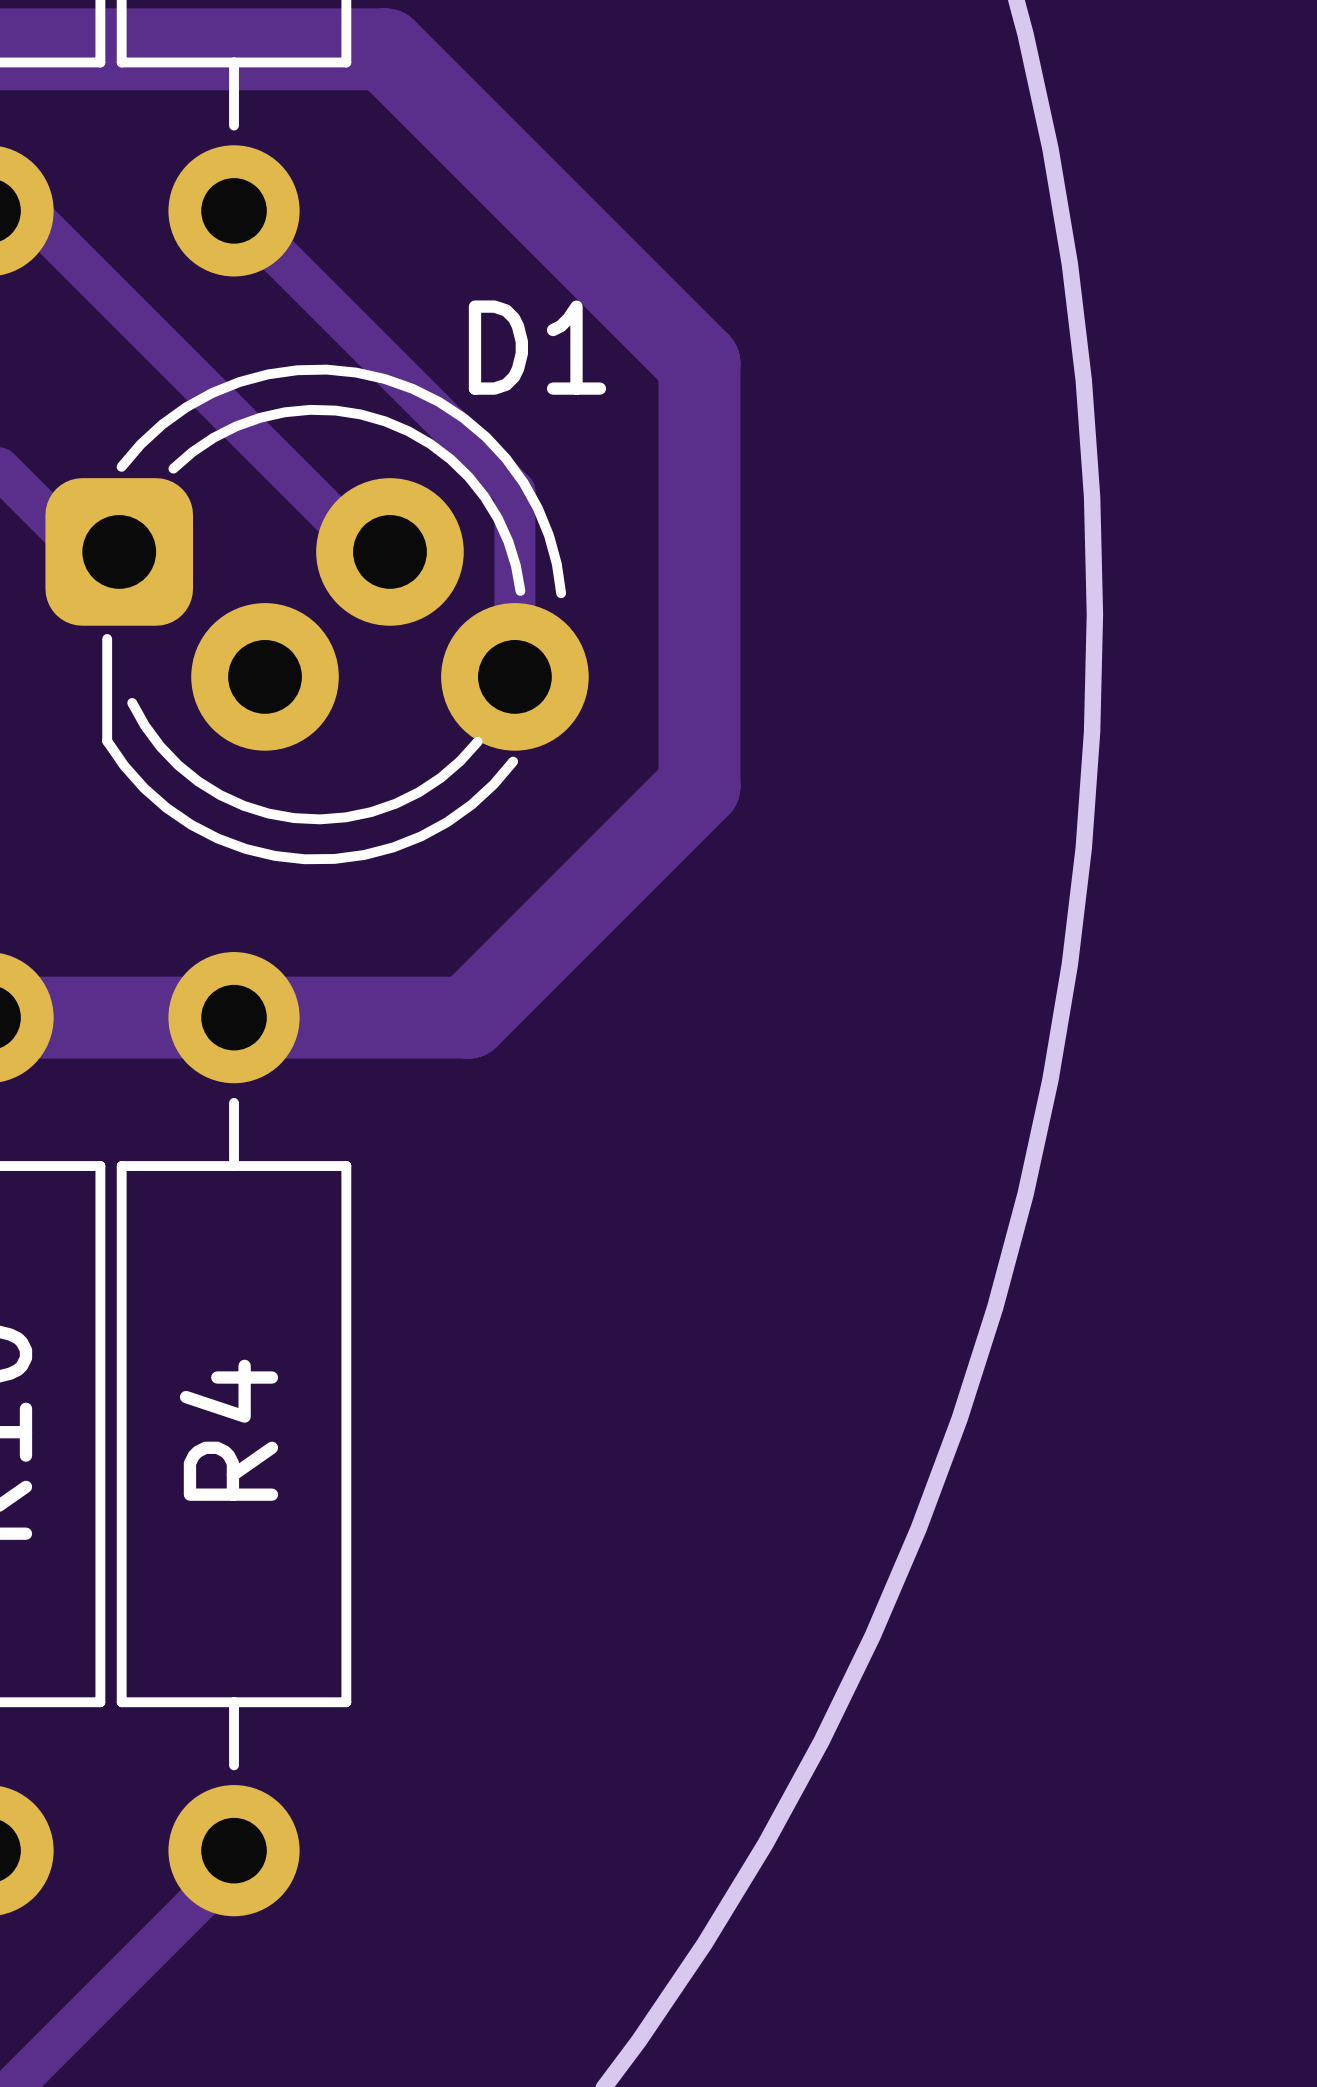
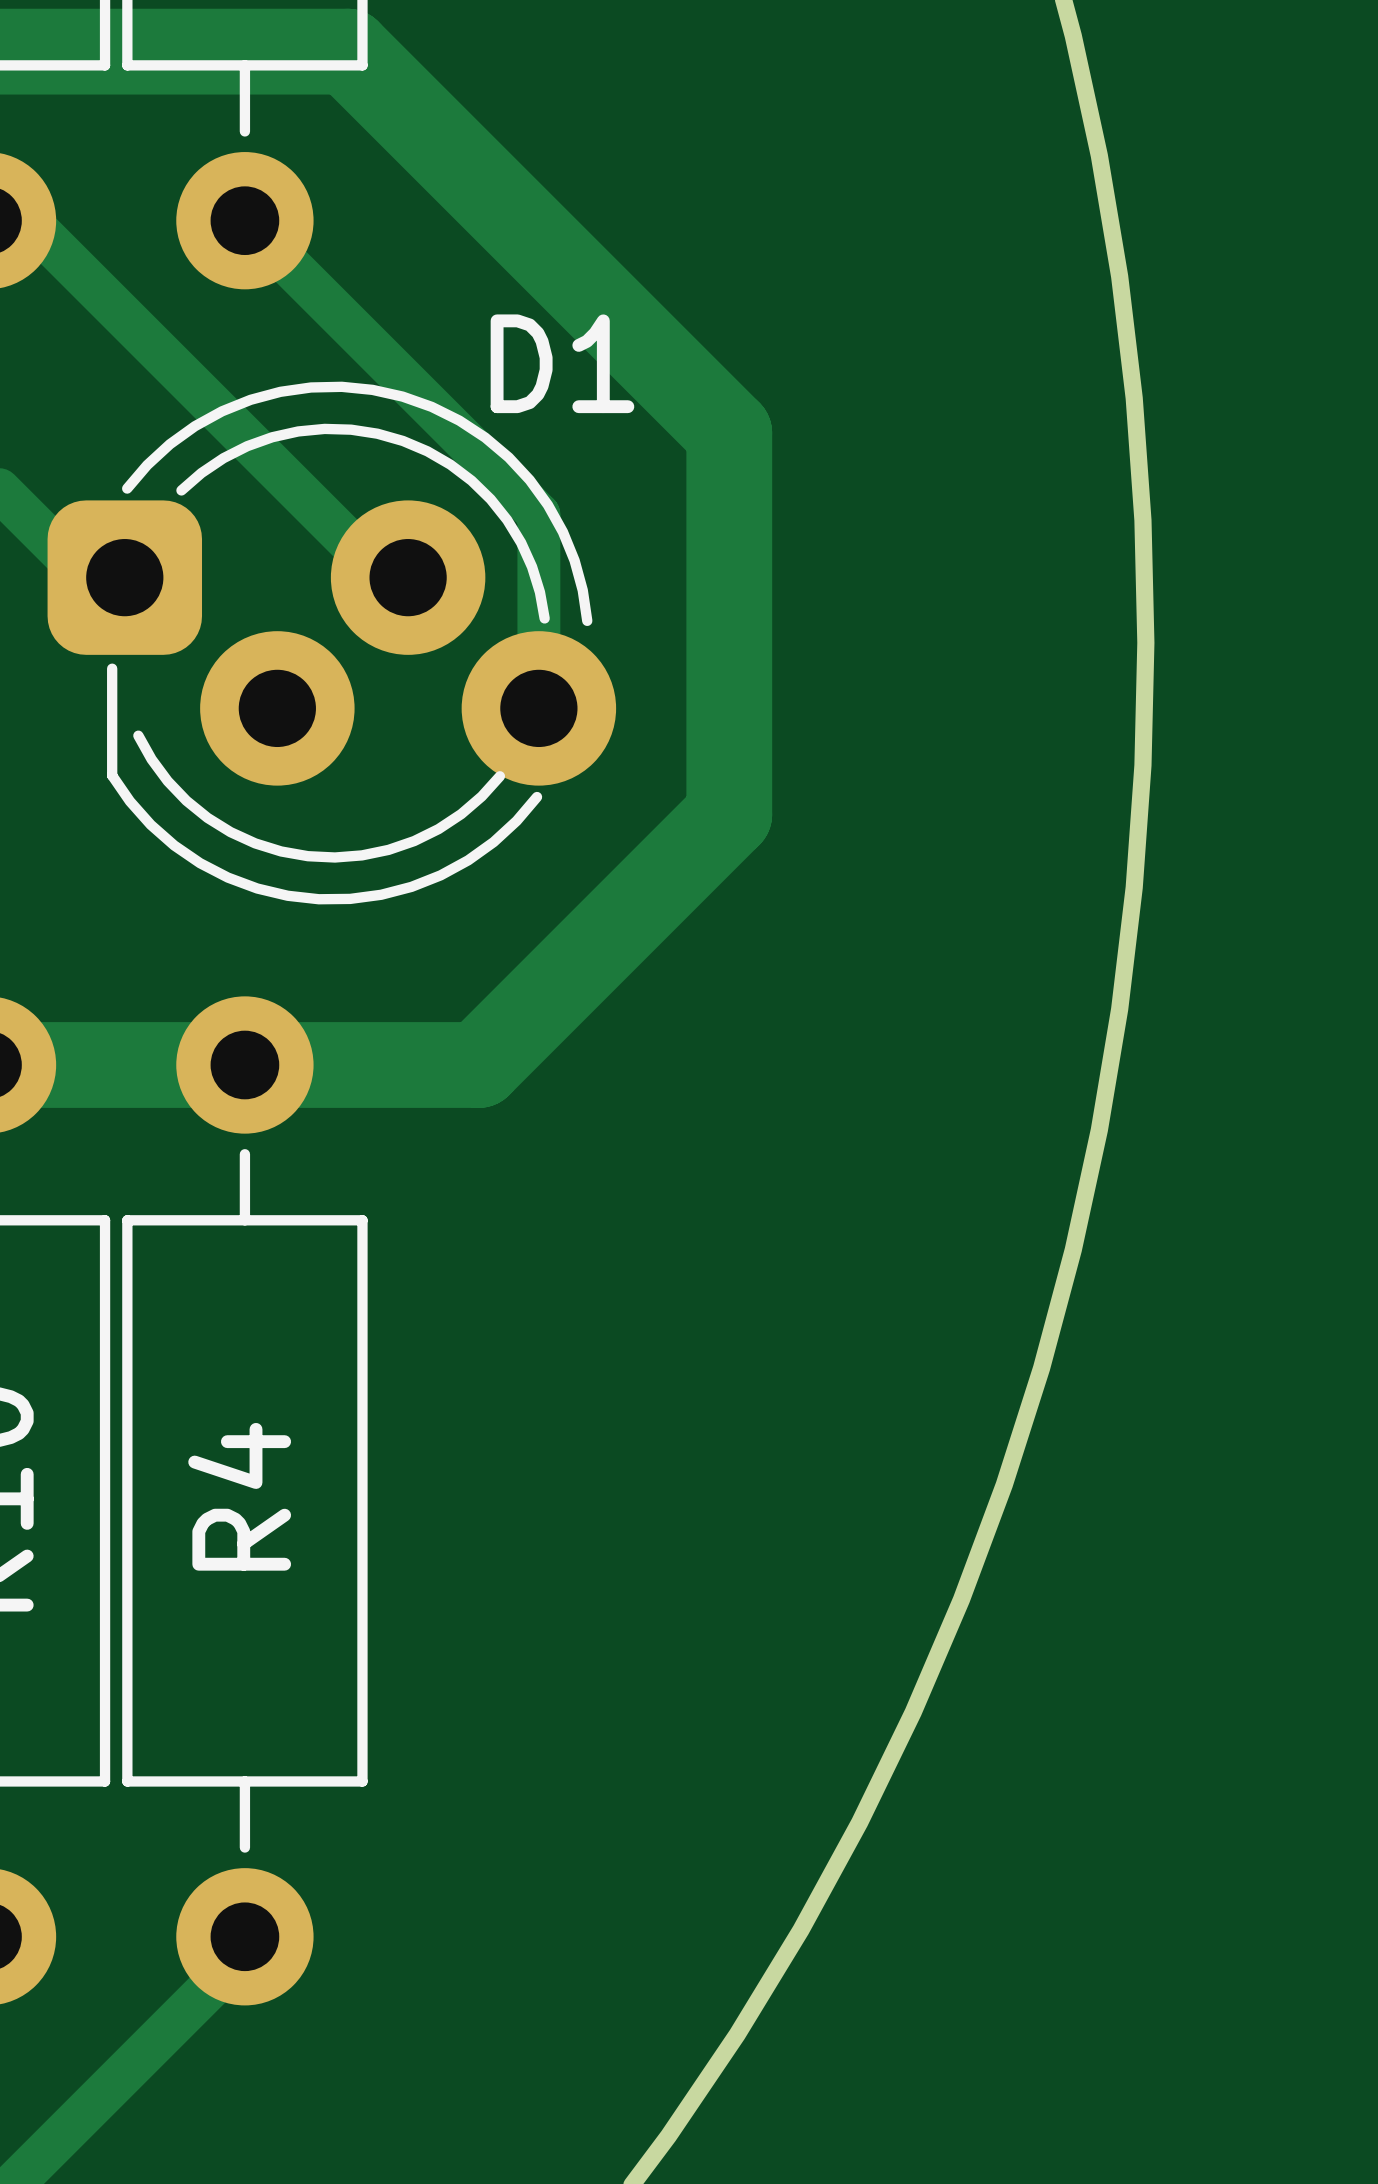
track: (332, 49) (385, 49) (699, 363) (699, 786) (468, 1017) (457, 1017) -> (347, 51) (729, 433) (729, 814) (478, 1065)

